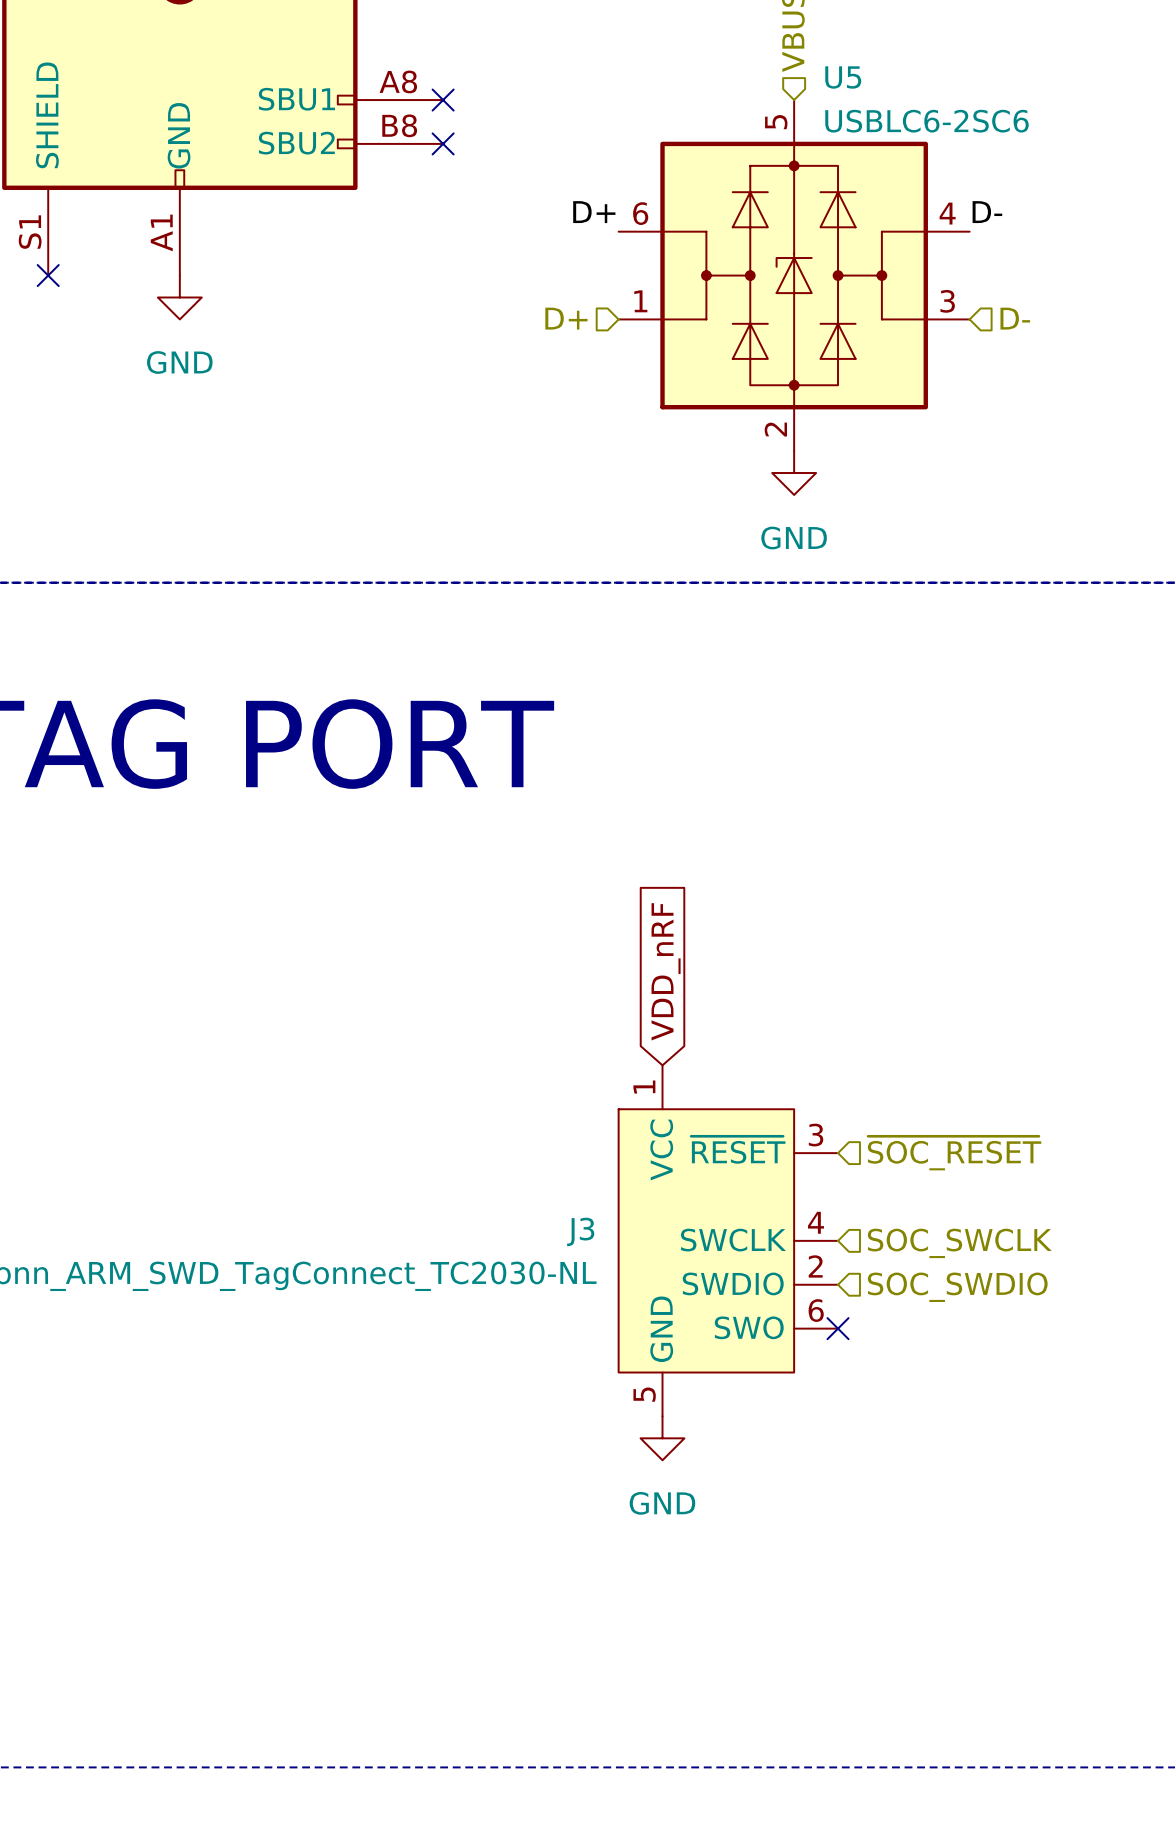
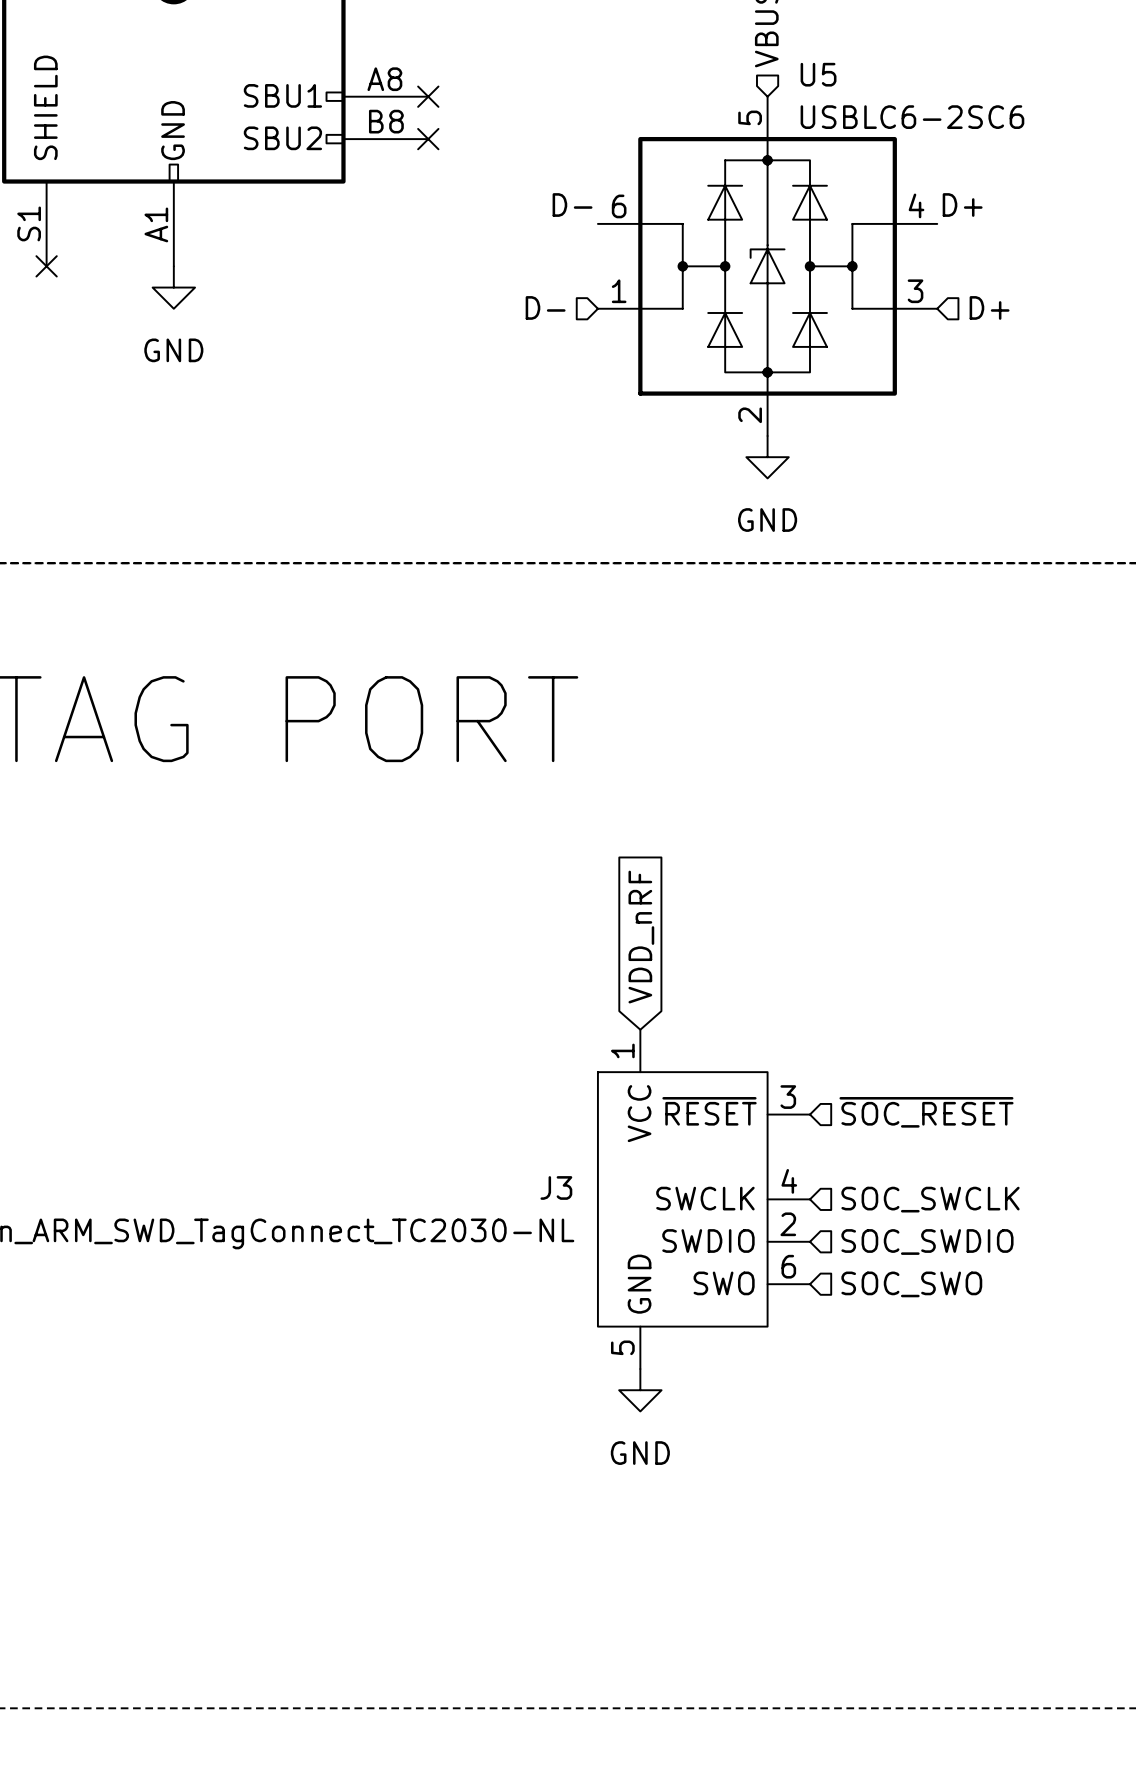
label: D+ (594, 212) -> D- (572, 205)
label: D- (987, 212) -> D+ (962, 205)
hierarchical label: D+ (566, 318) -> D- (545, 307)
hierarchical label: D- (1015, 318) -> D+ (989, 307)
no-connect mark: (838, 1328) -> none
hierarchical label: none -> SOC_SWO (911, 1284)

